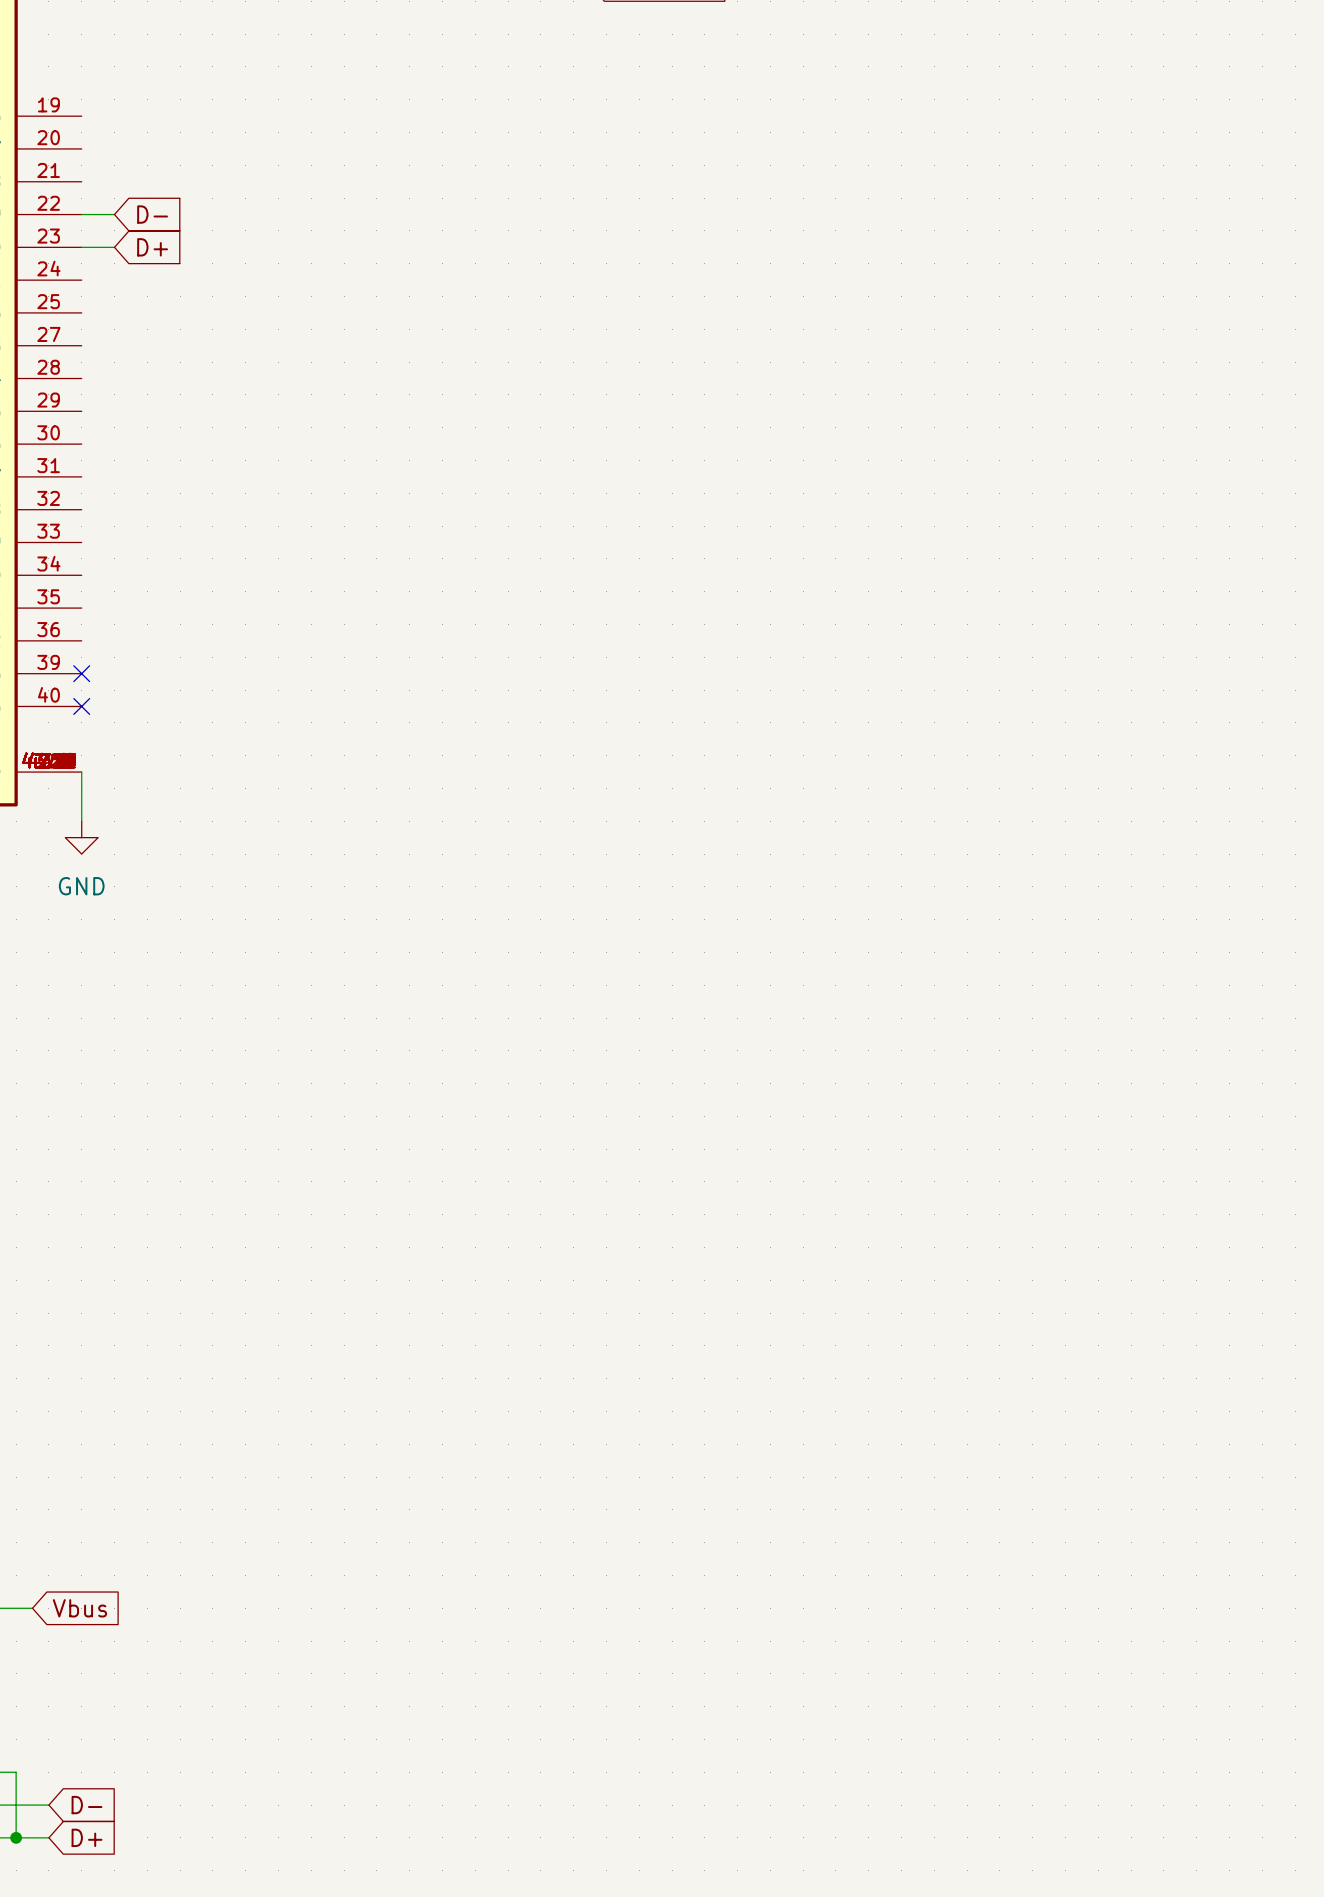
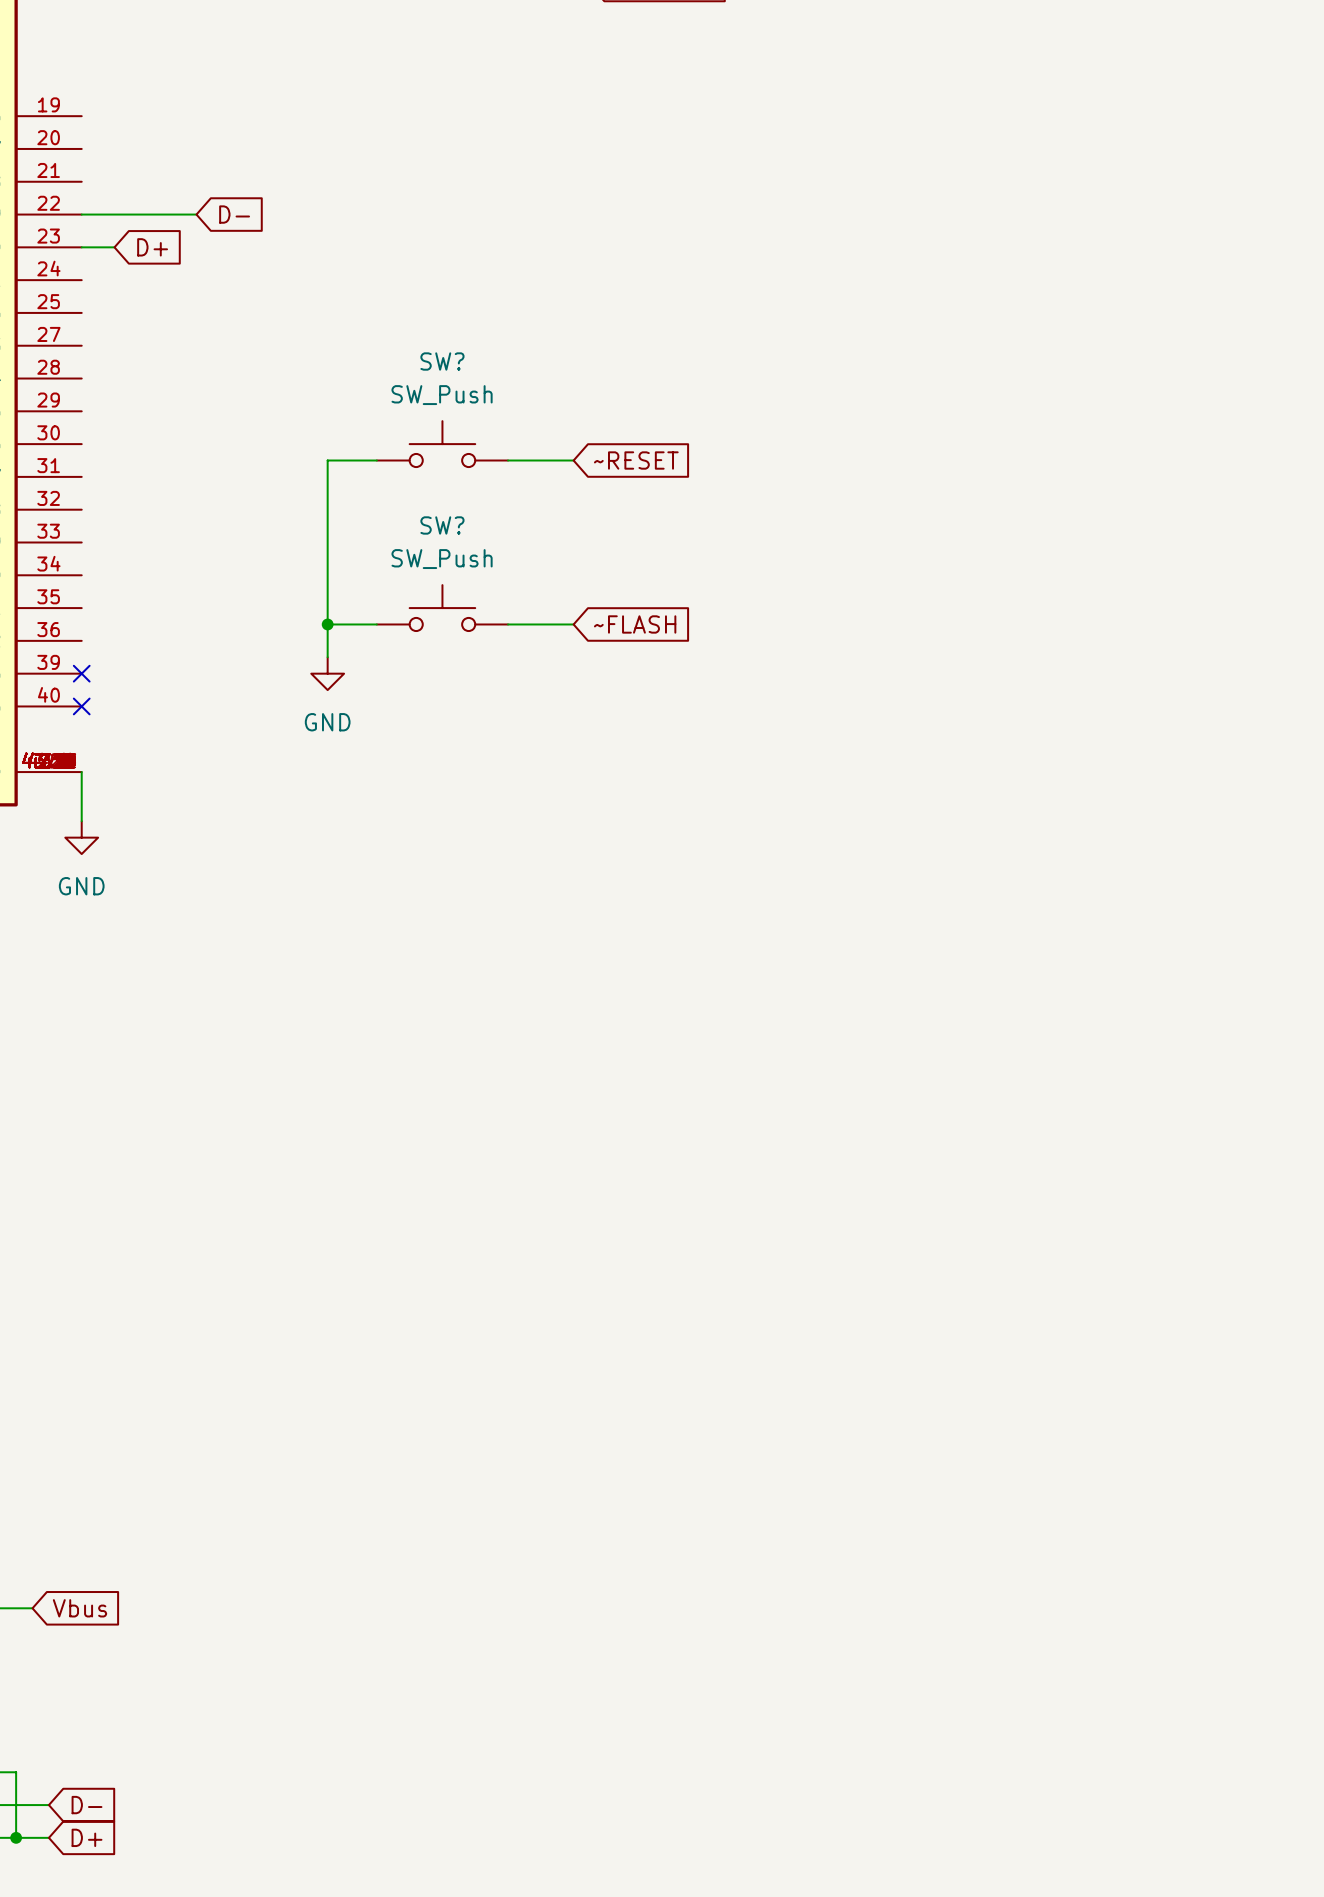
wire: none -> (114, 214) (196, 214)
global label position: D- (152, 214) -> D- (234, 214)
SW?: none -> SW_Push (442, 444)
wire: none -> (376, 460) (327, 460) (327, 657)
wire: none -> (508, 460) (573, 460)
global label: none -> ~RESET (636, 460)
SW?: none -> SW_Push (442, 608)
wire: none -> (327, 624) (376, 624)
junction: none -> (327, 624)
wire: none -> (508, 624) (573, 624)
global label: none -> ~FLASH (635, 624)
power symbol: none -> GND (327, 673)

